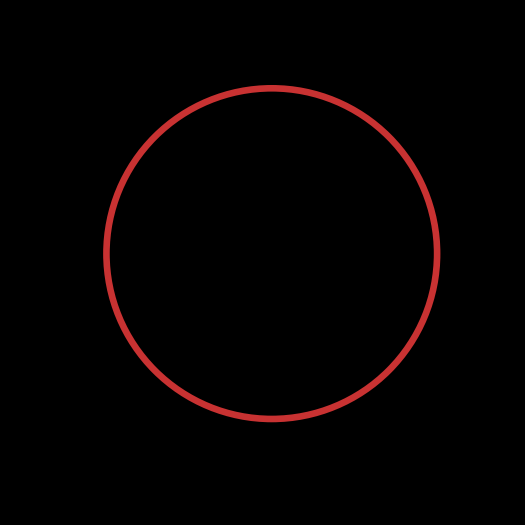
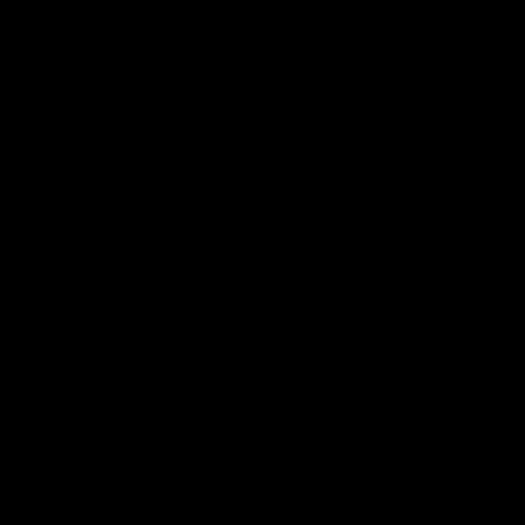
drawing: [103, 84, 441, 423] -> none

